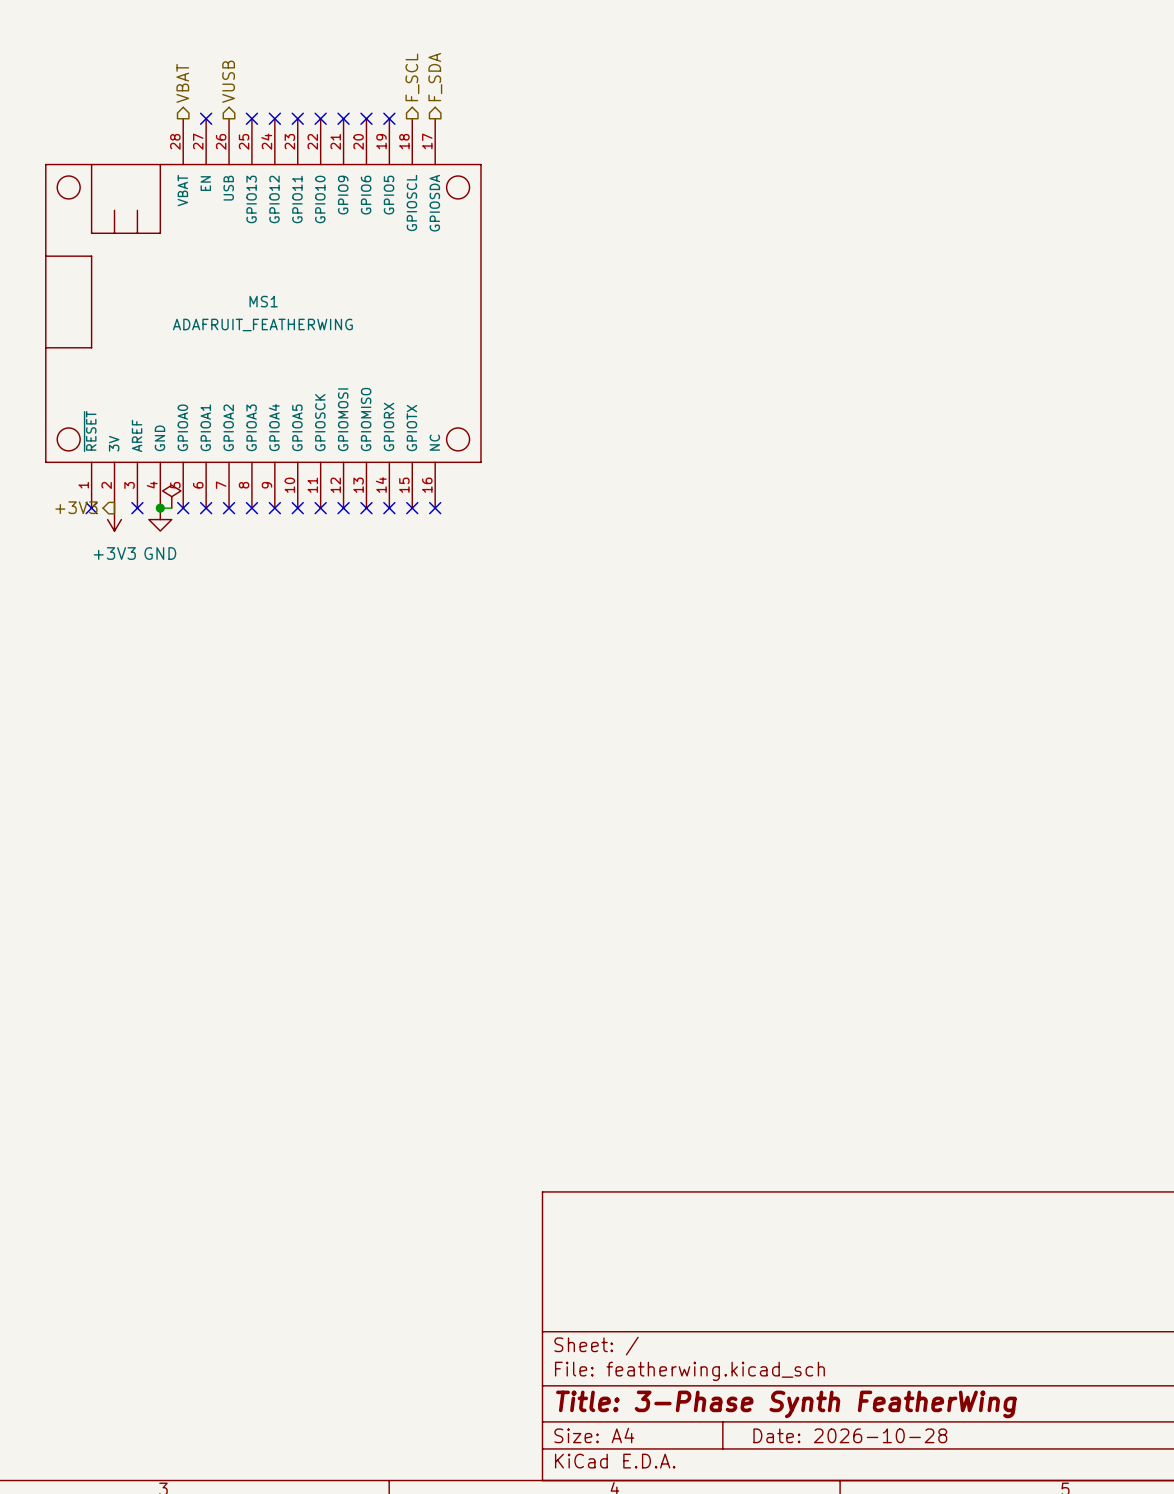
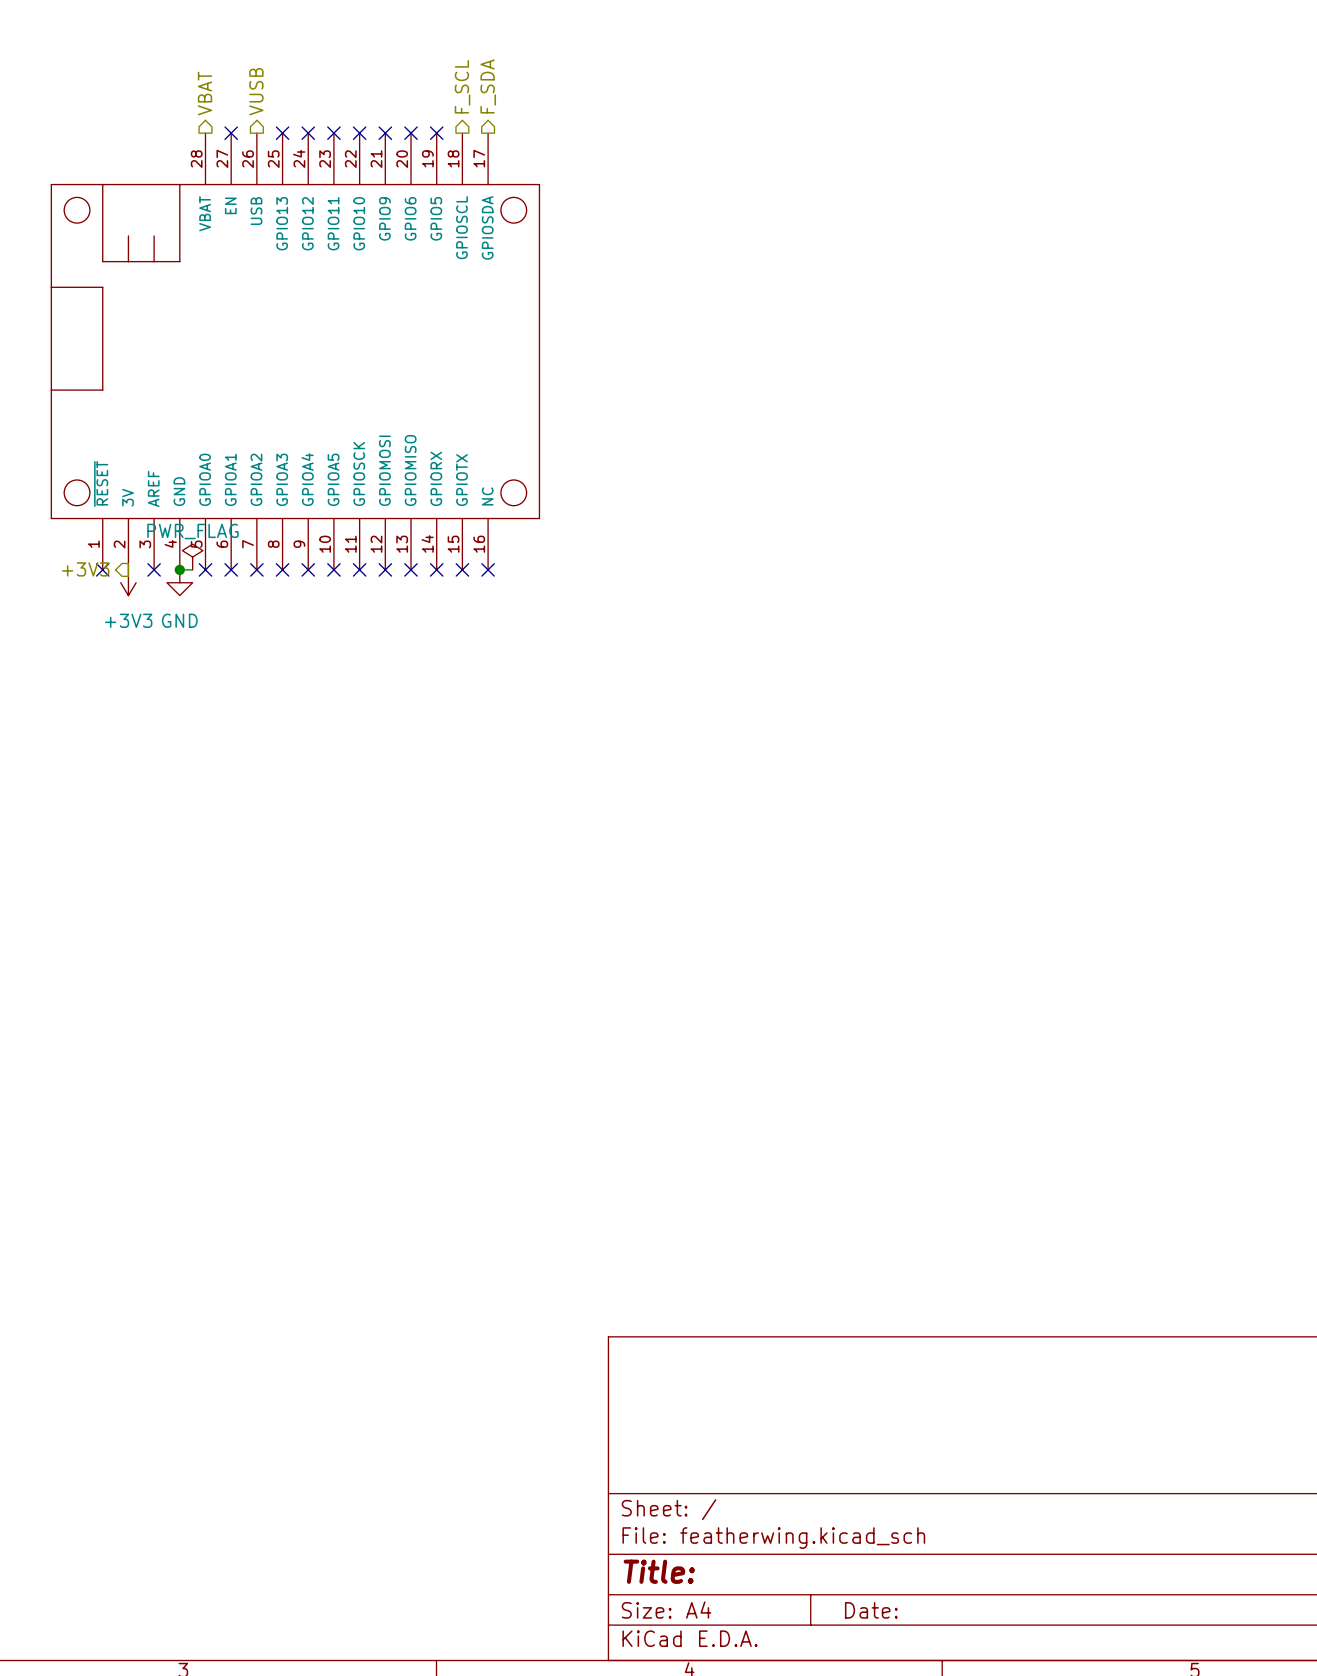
MS1 name: MS1 (263, 301) -> none
MS1 value: ADAFRUIT_FEATHERWING (262, 324) -> none
power symbol text: none -> PWR_FLAG (192, 531)
title block: Title: 3-Phase Synth FeatherWing (786, 1404) -> Title: (659, 1571)
title block: Date: 2026-10-28 (850, 1435) -> Date: (871, 1610)

